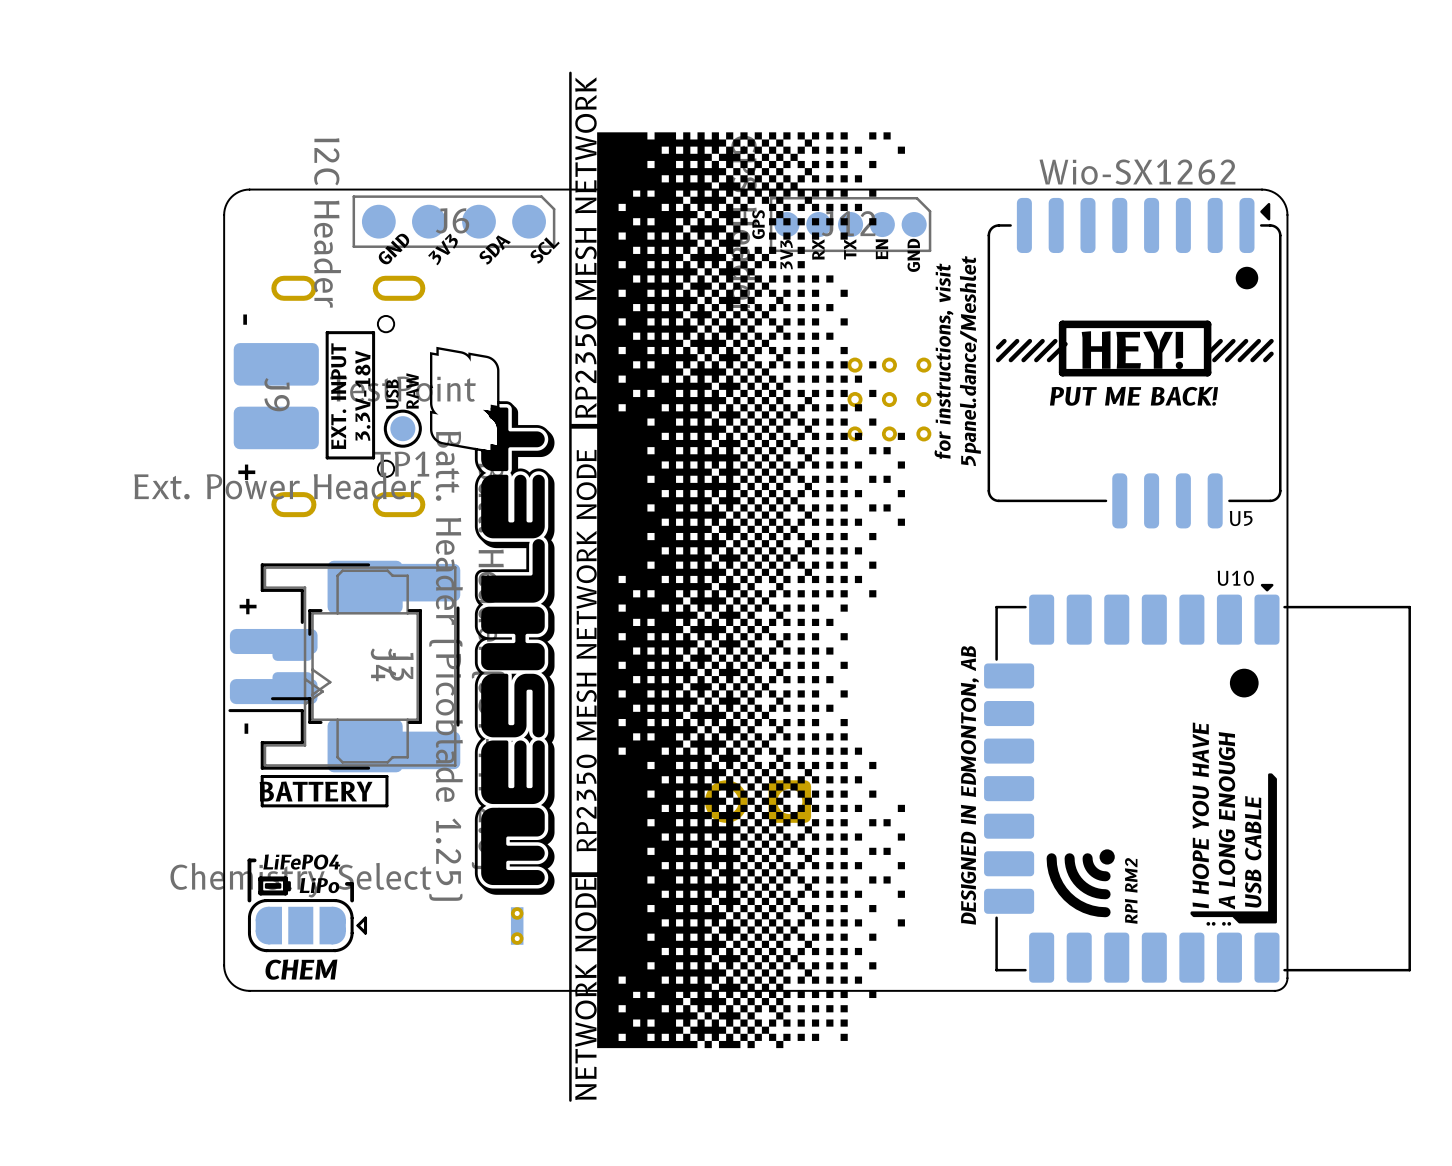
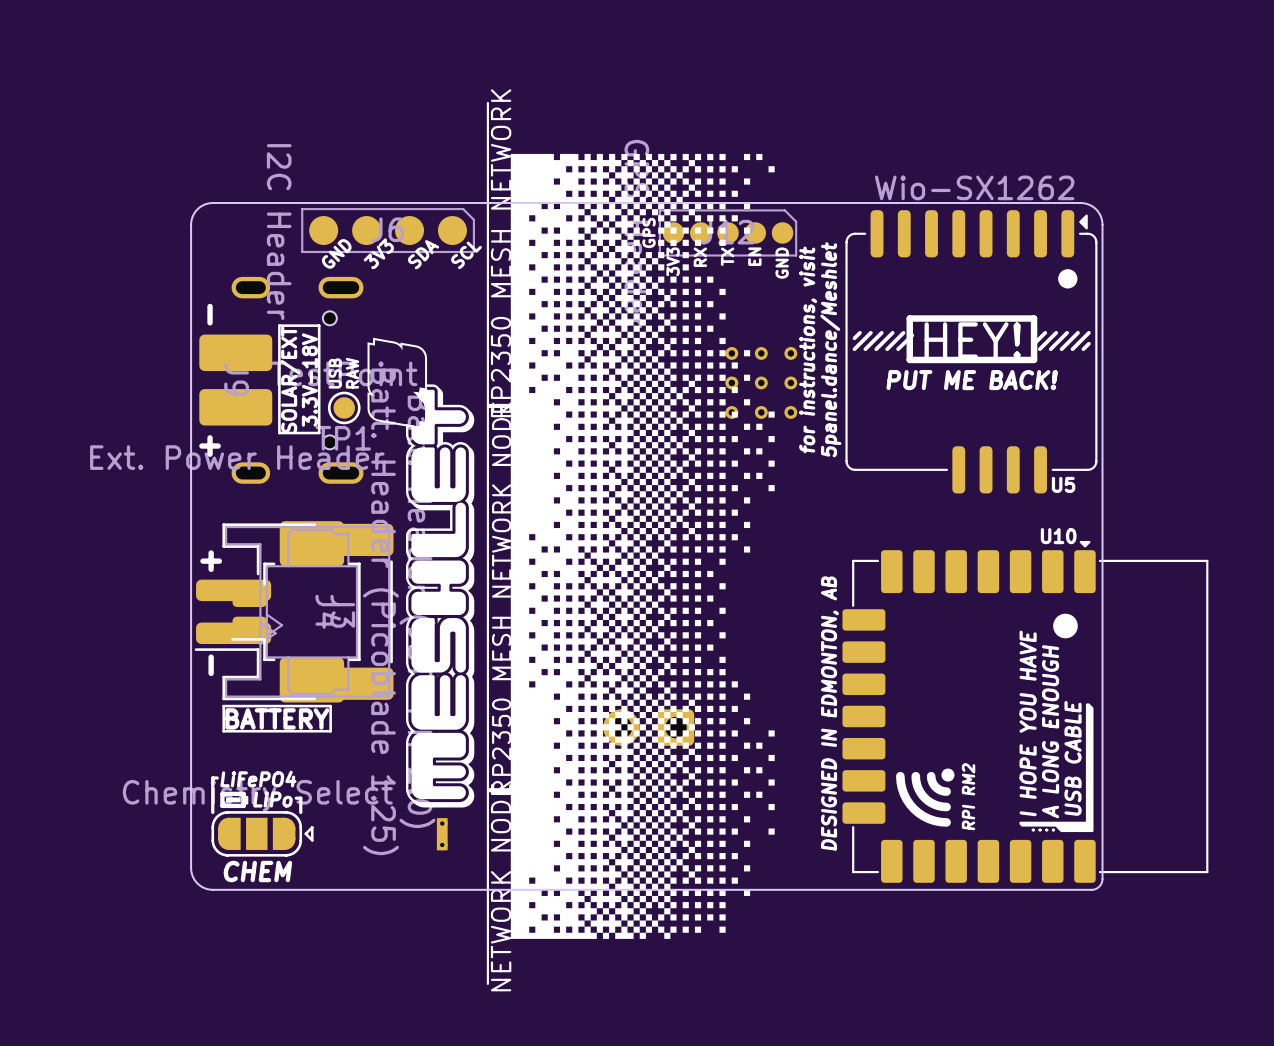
text: EXT. INPUT (338, 396) -> SOLAR/EXT (290, 379)

